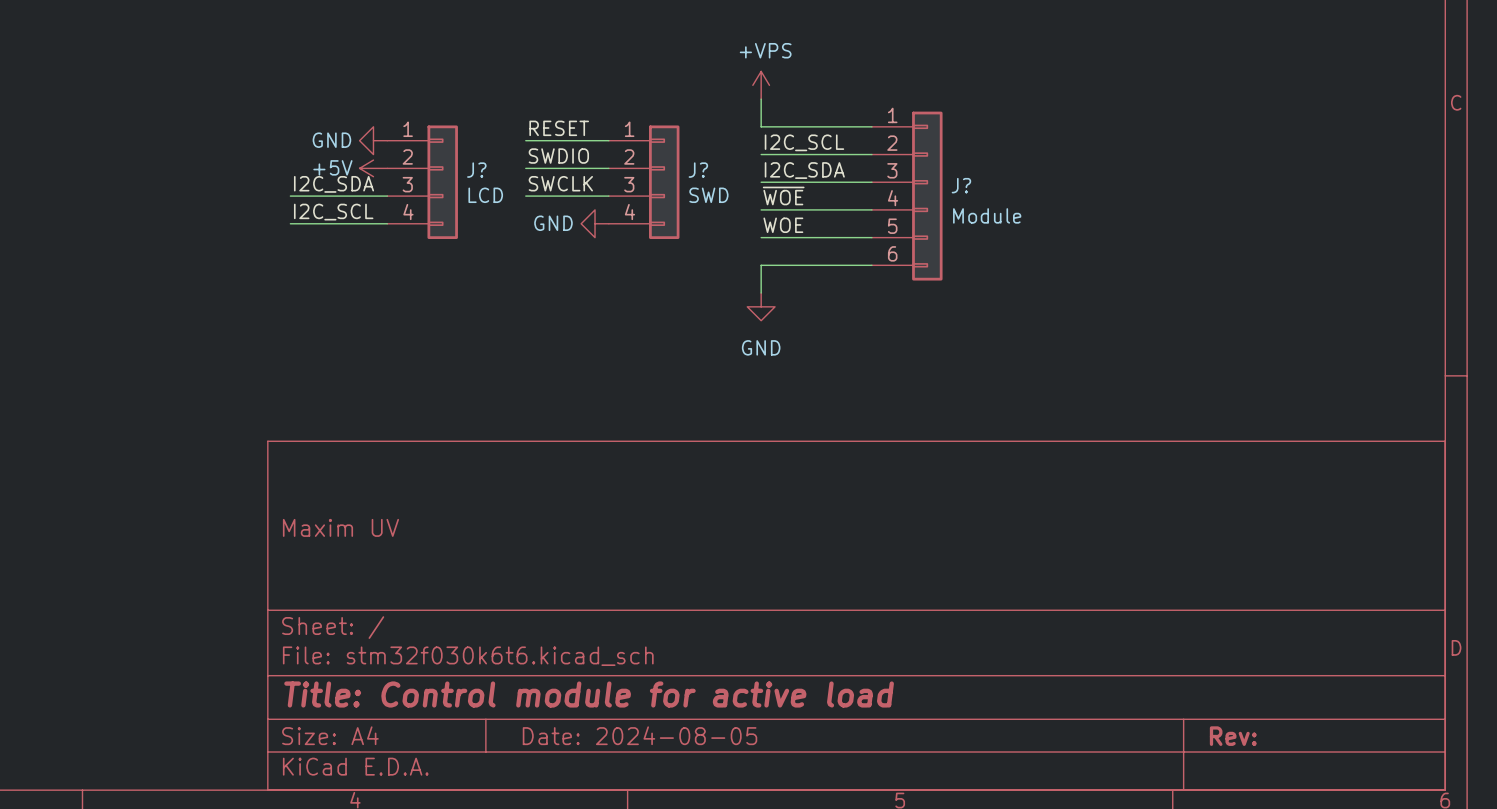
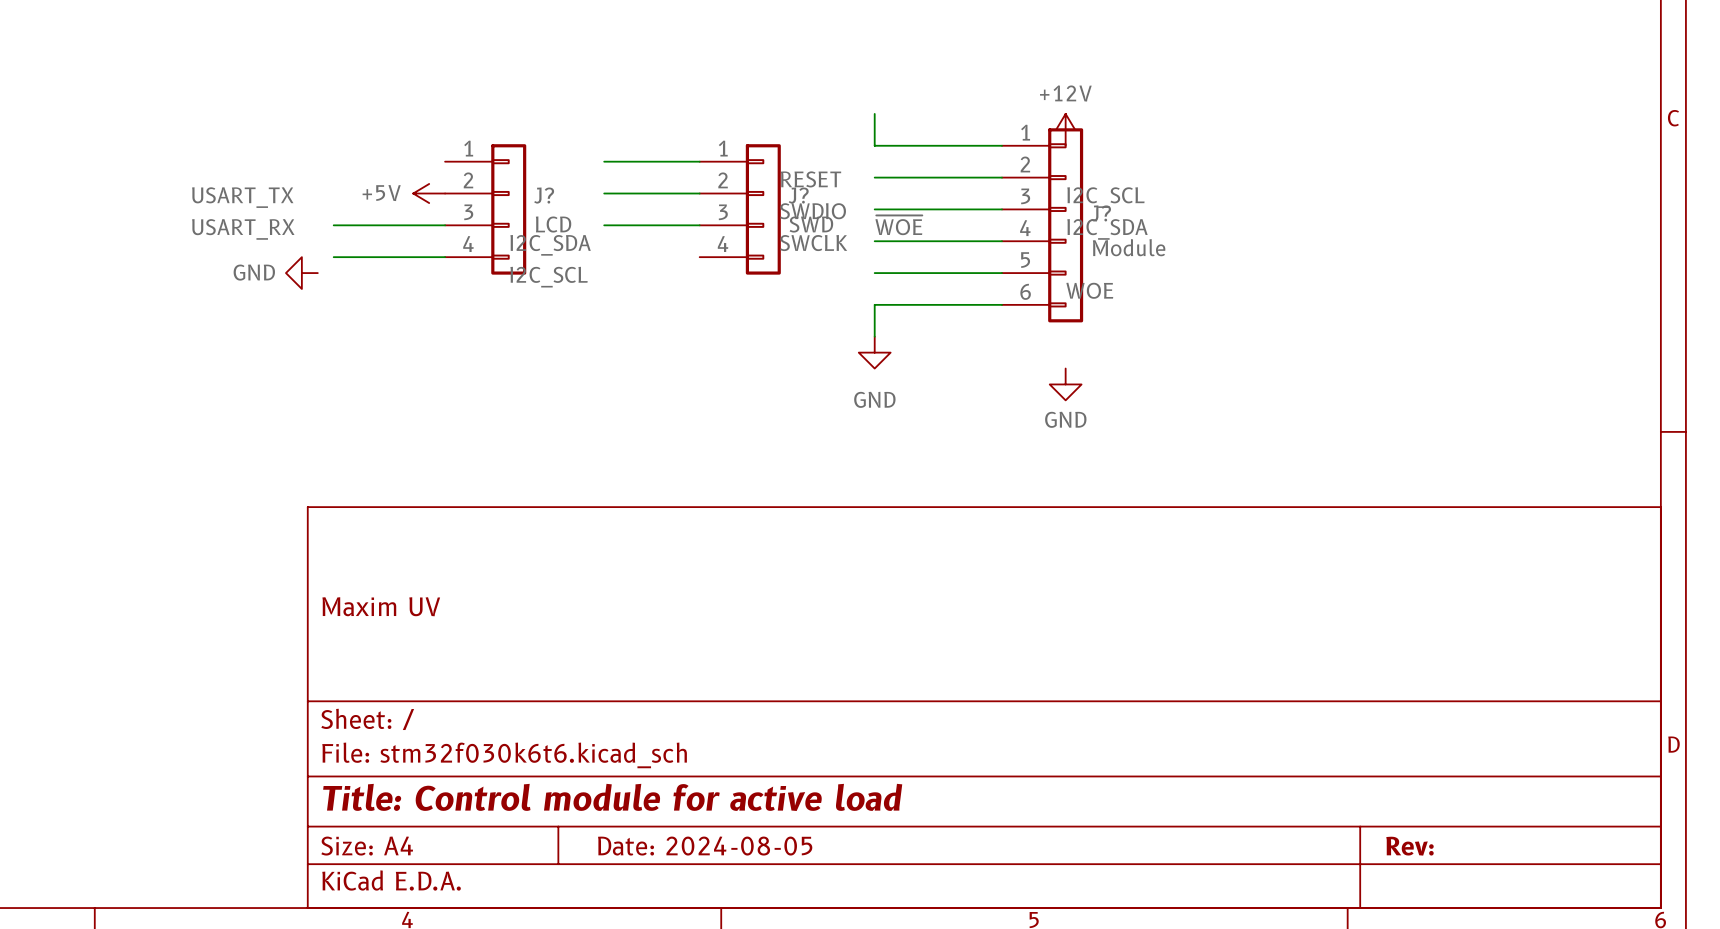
power symbol: +VPS (761, 85) -> none
power symbol: none -> +12V (1065, 129)
label position: RESET (559, 128) -> RESET (811, 179)
power symbol position: GND (373, 140) -> GND (301, 273)
label: I2C_SCL (804, 142) -> none
label position: SWDIO (558, 156) -> SWDIO (813, 211)
label: none -> USART_TX (242, 197)
label: I2C_SDA (804, 170) -> none
label: none -> I2C_SCL (1105, 197)
label position: SWCLK (560, 183) -> SWCLK (813, 243)
label position: I2C_SDA (334, 184) -> I2C_SDA (550, 245)
label: none -> USART_RX (243, 229)
label: none -> I2C_SDA (1107, 229)
label position: I2C_SCL (333, 212) -> I2C_SCL (549, 277)
power symbol: GND (595, 223) -> none
label position: WOE (783, 225) -> WOE (1089, 290)
power symbol: none -> GND (1065, 384)

